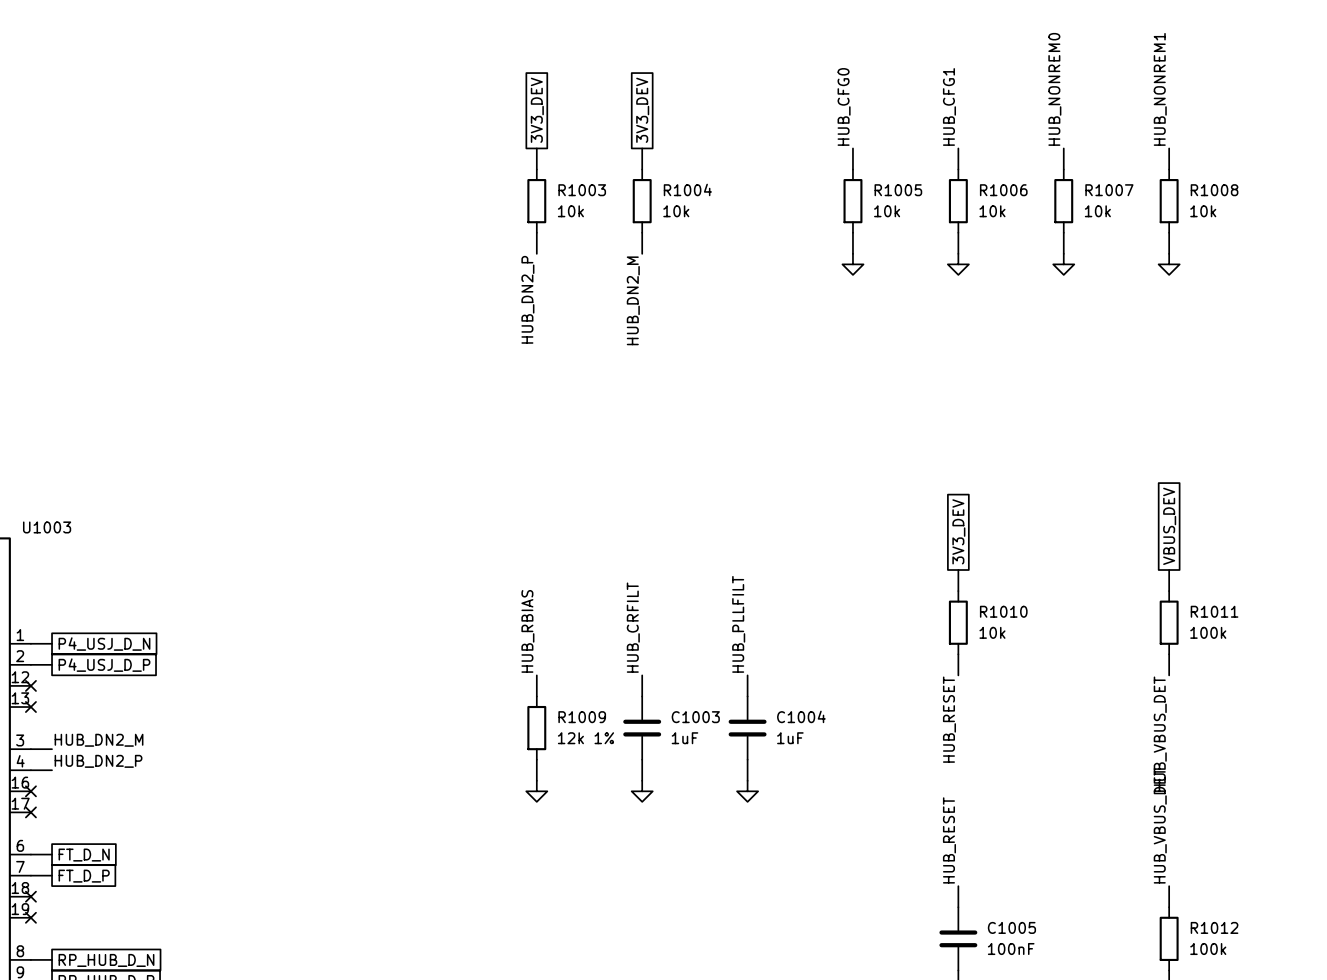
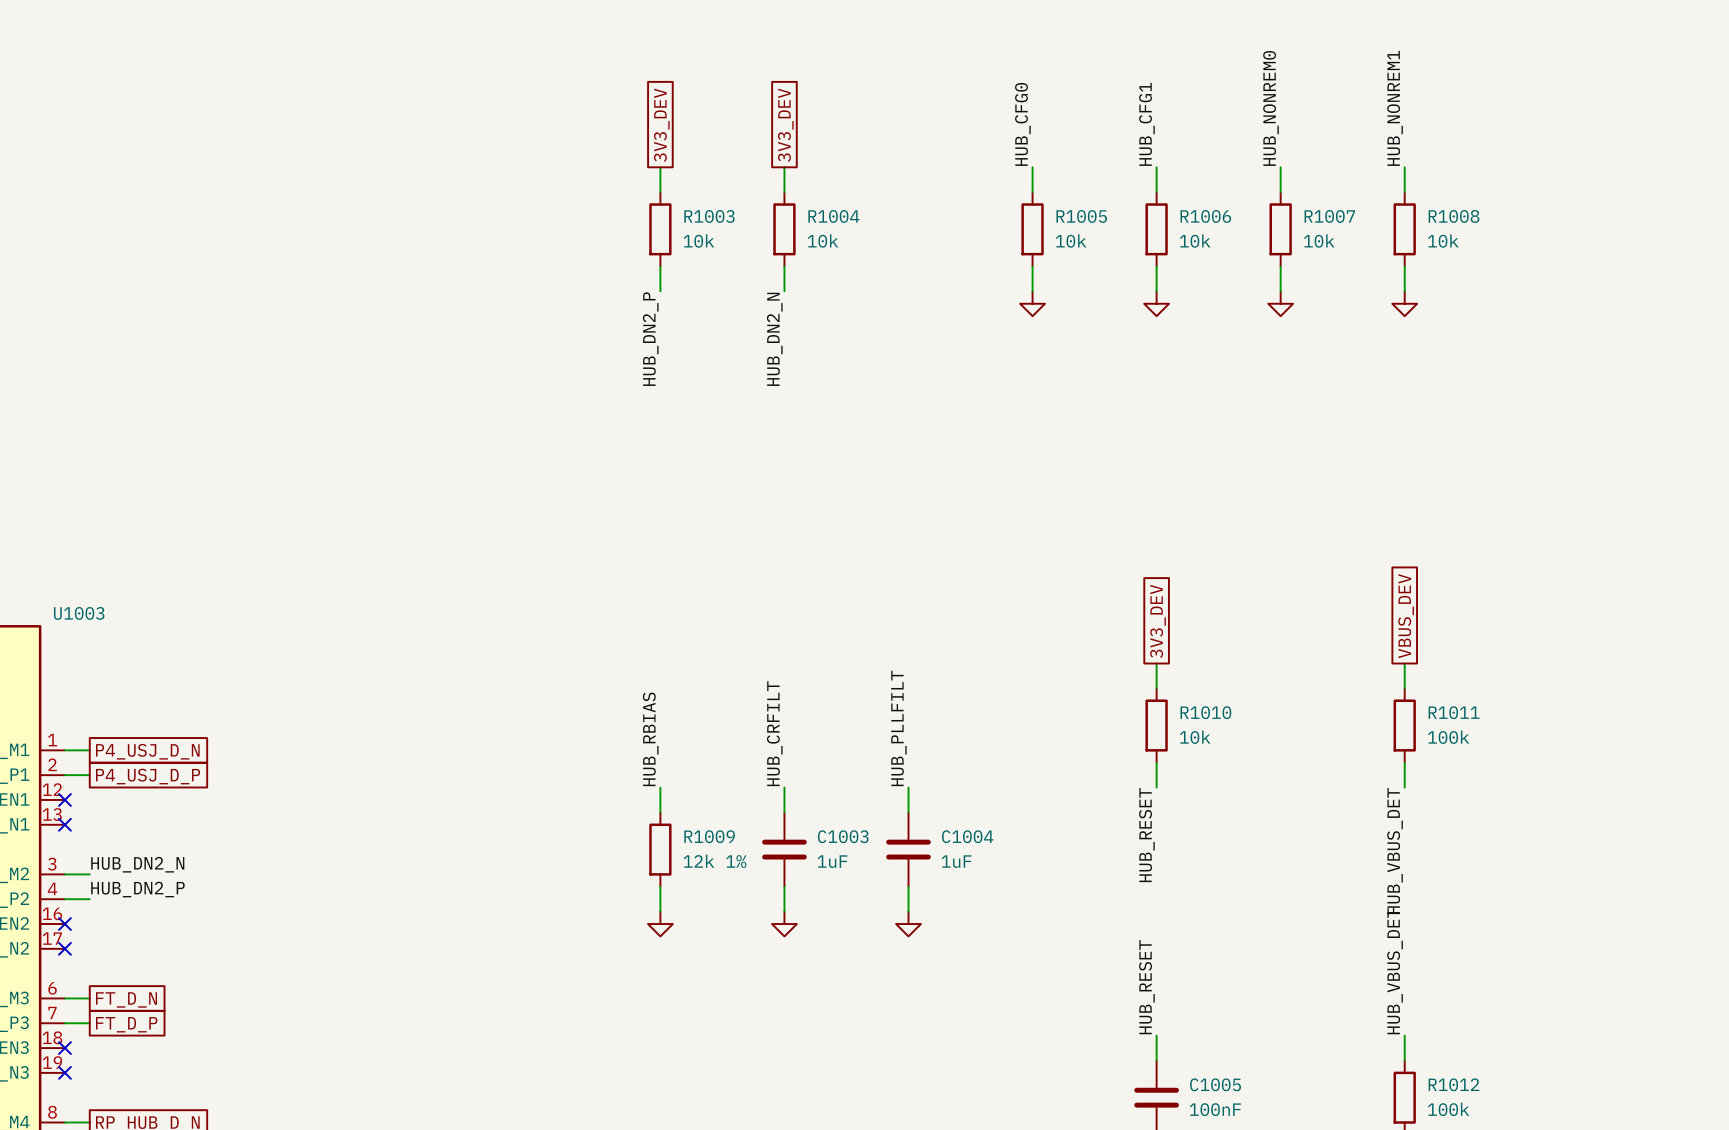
label: HUB_DN2_M (633, 300) -> HUB_DN2_N (774, 339)
label: HUB_DN2_M (99, 740) -> HUB_DN2_N (137, 864)

